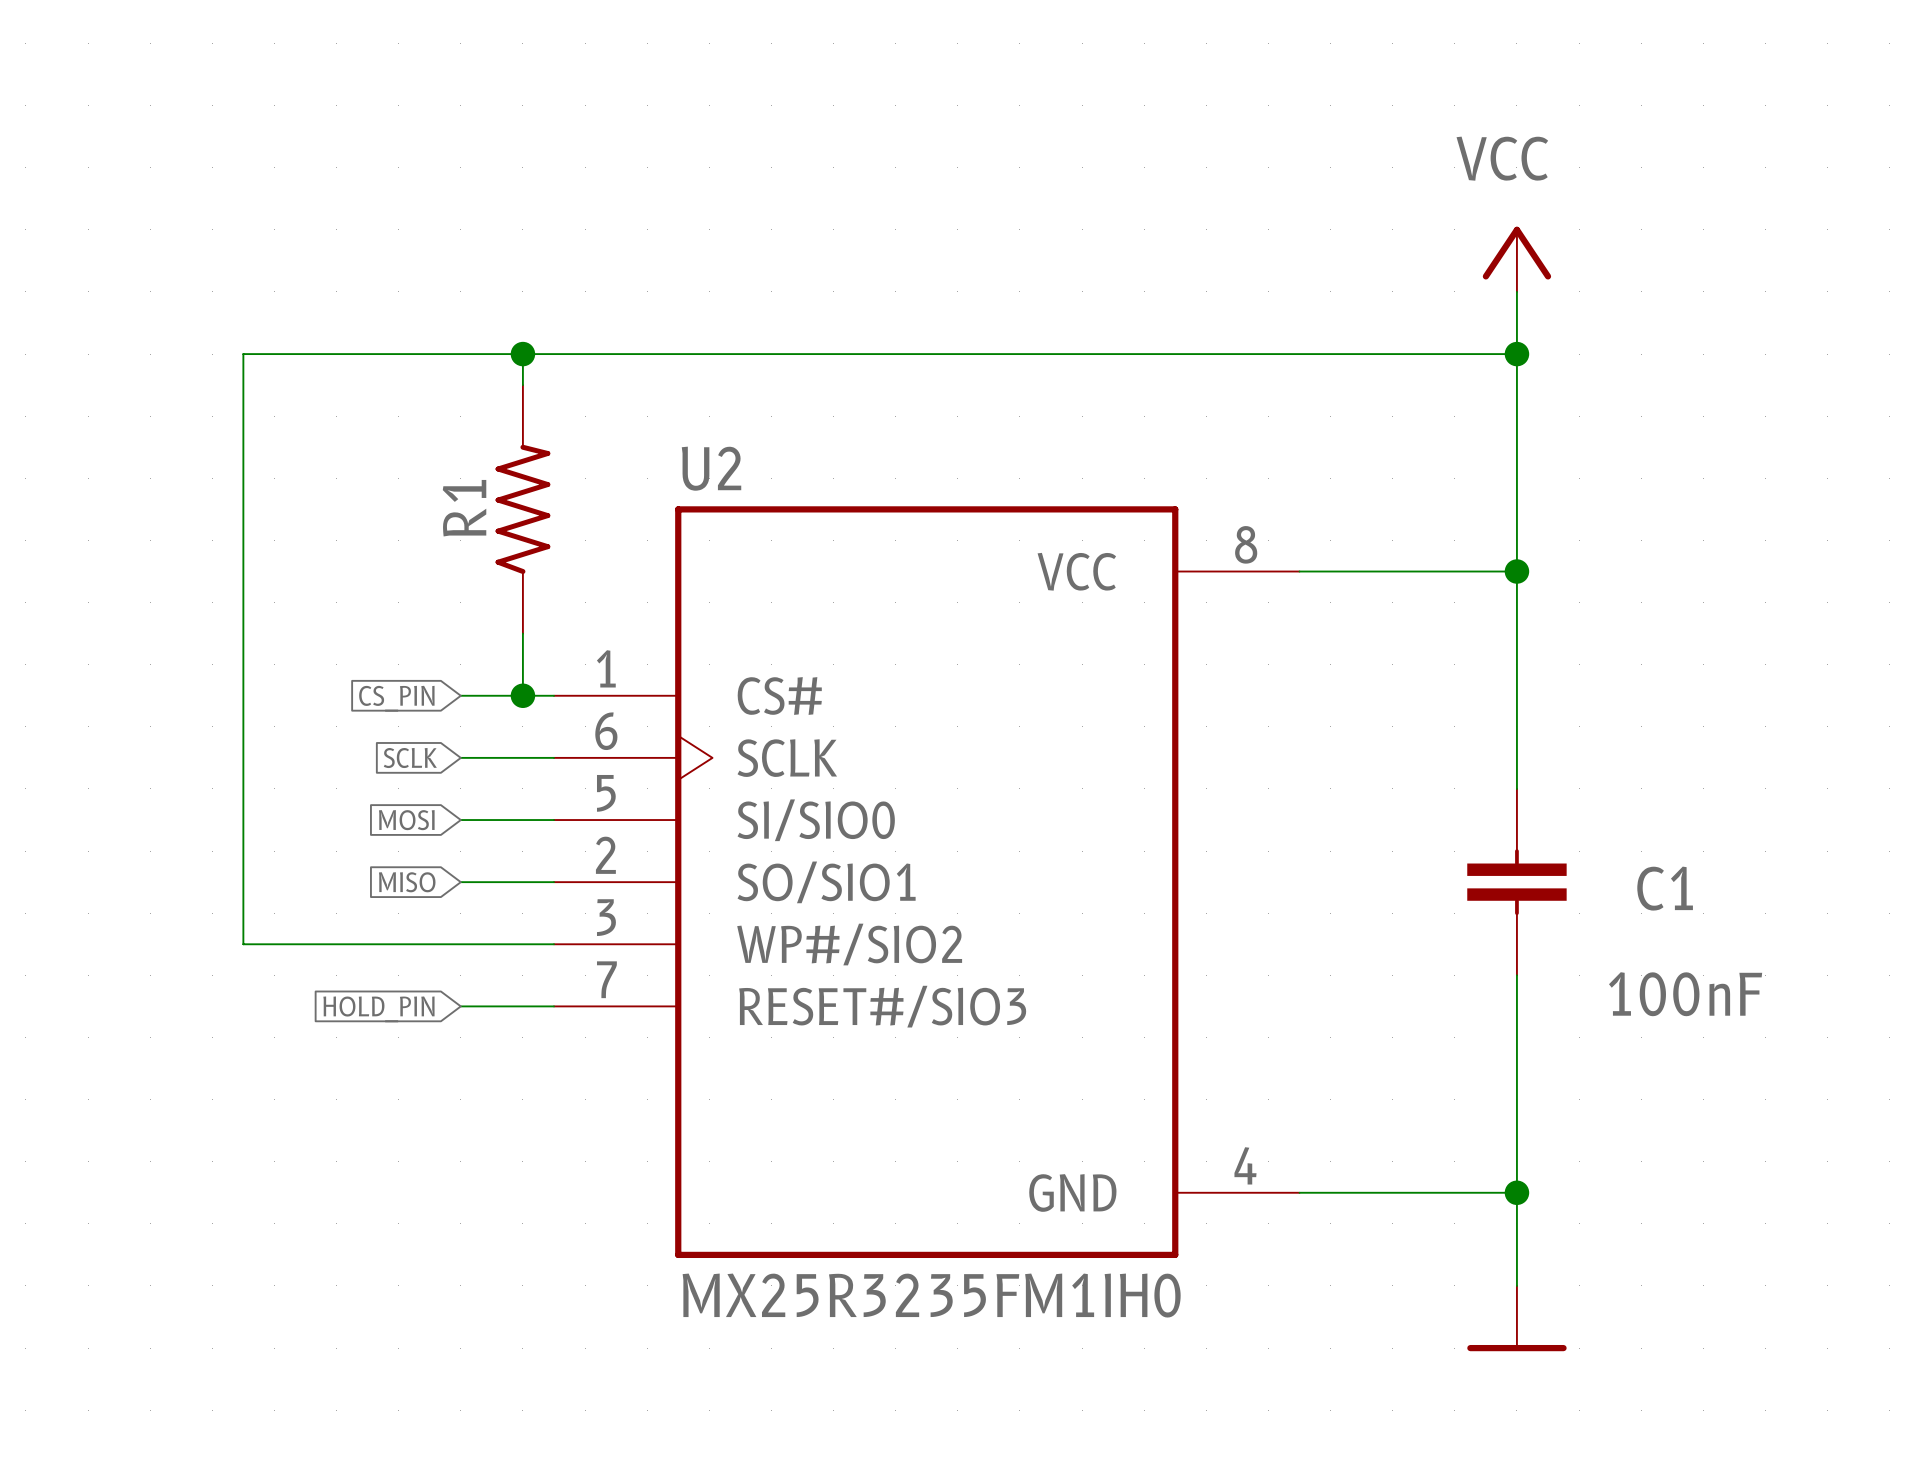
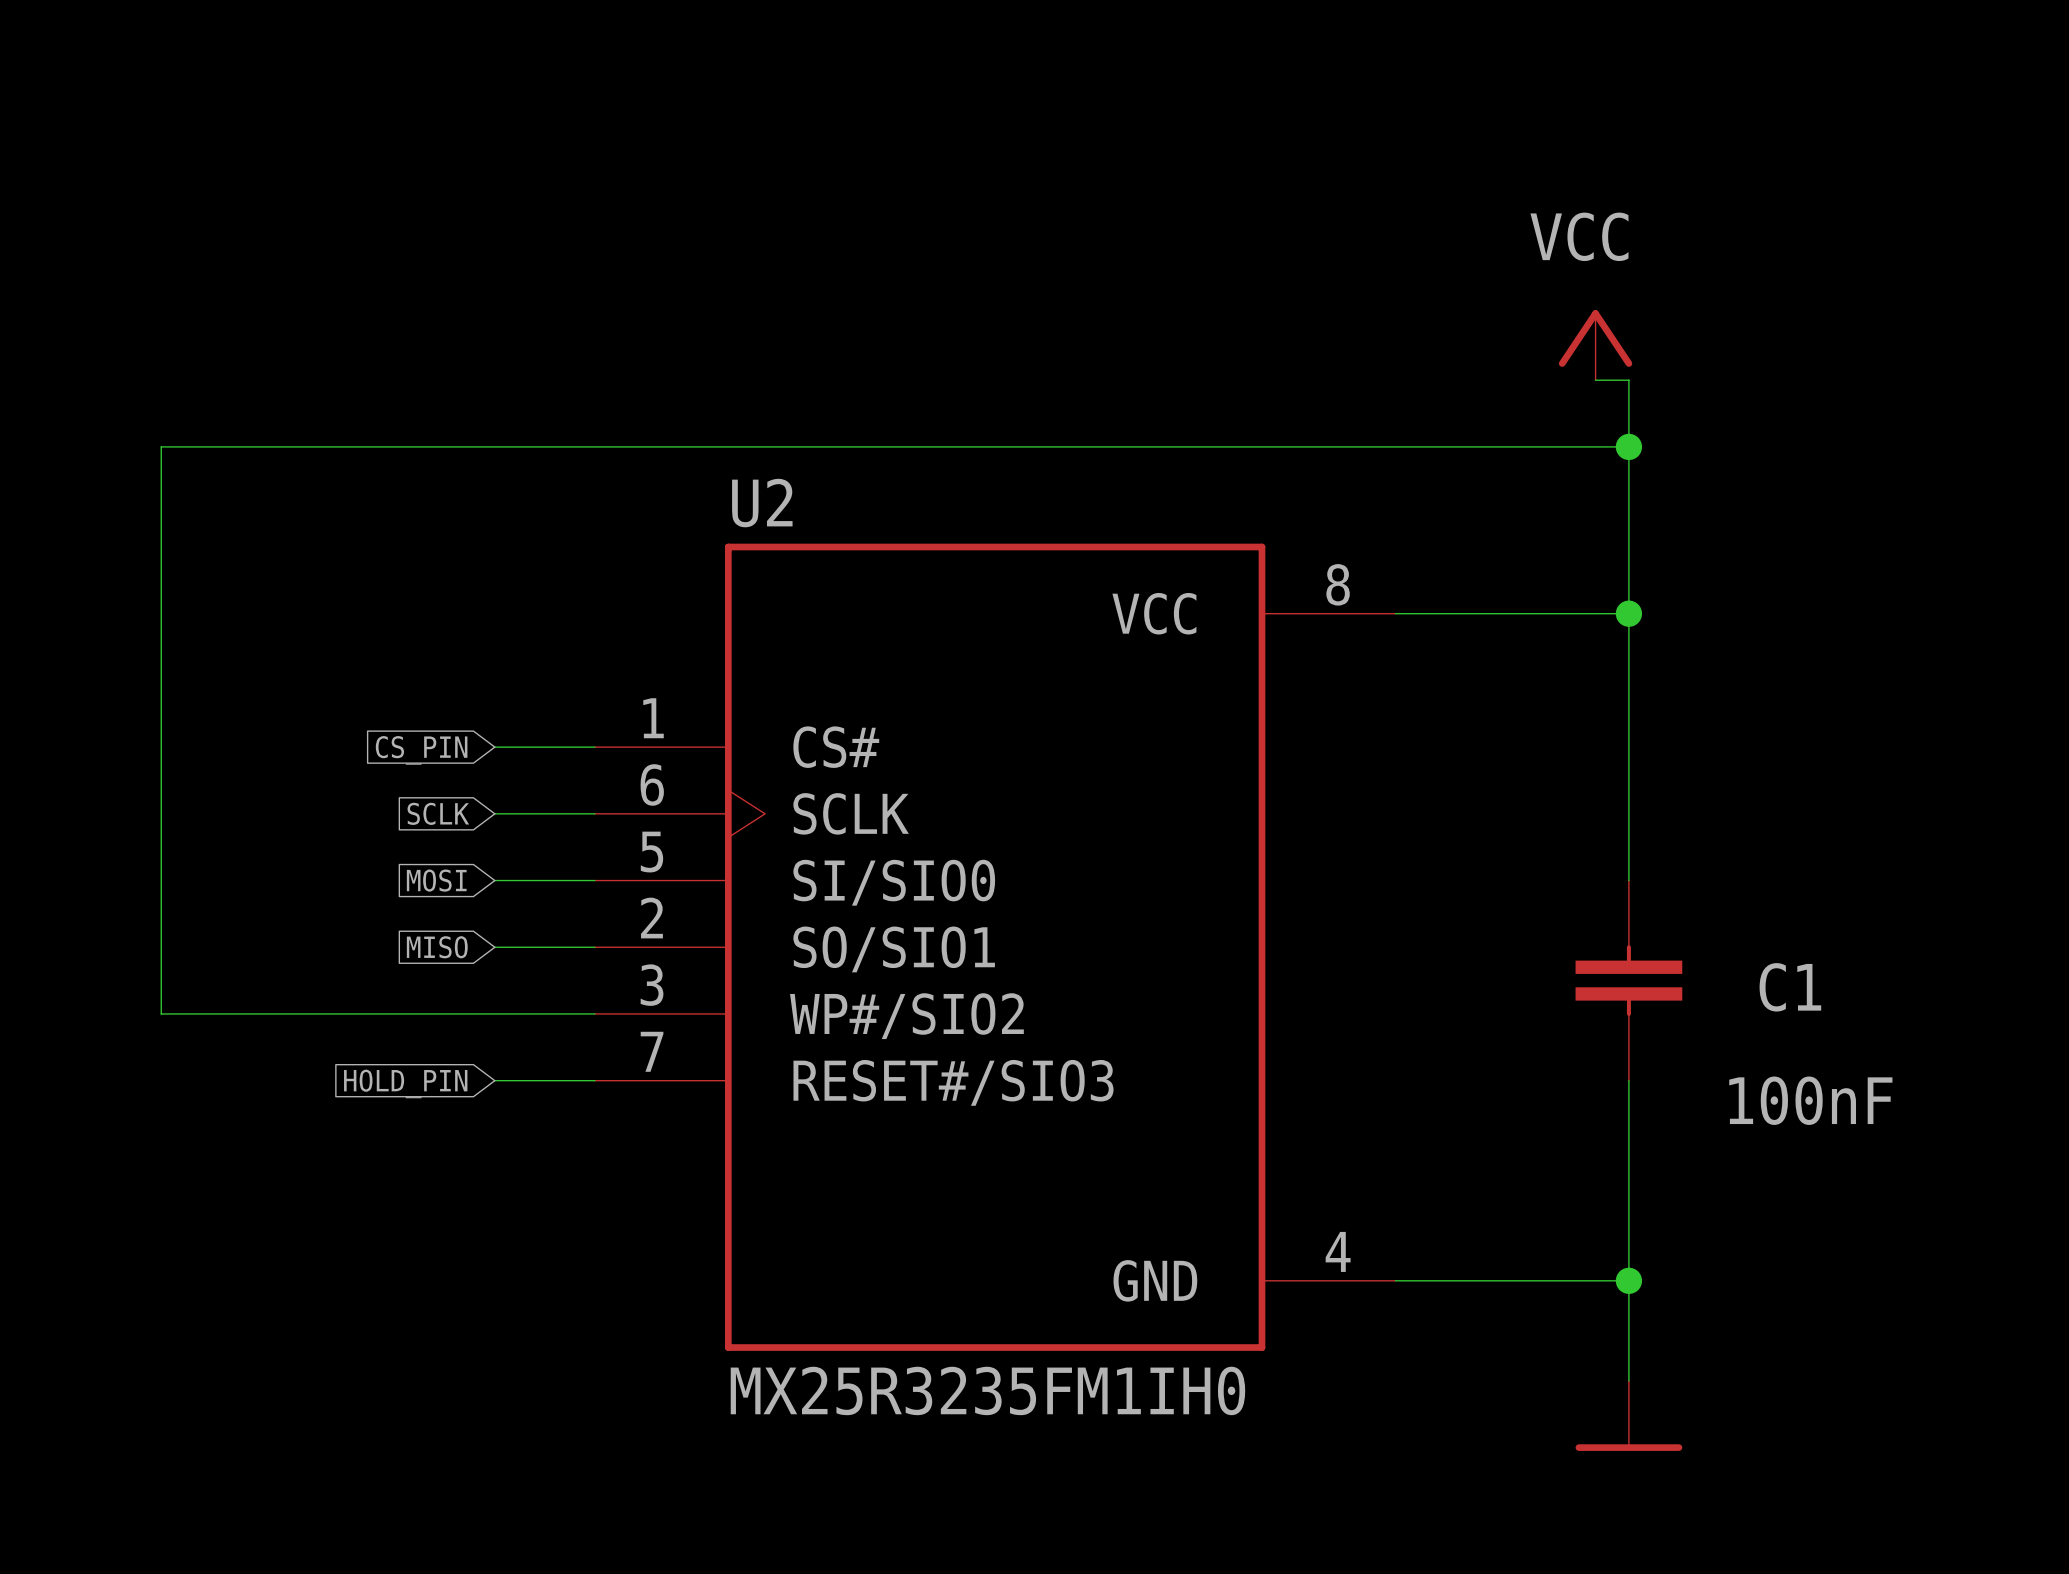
power symbol position: VCC (1516, 259) -> VCC (1595, 345)
wire: (1516, 291) (1516, 354) -> none
wire: (522, 354) (522, 385) -> none
junction: (522, 354) -> none
wire: (1485, 354) (243, 354) (243, 944) -> (1628, 446) (161, 446) (161, 1013) (261, 1013)
junction position: (1516, 354) -> (1628, 446)
R1: (522, 509) -> none
wire: (522, 633) (522, 695) -> none
junction: (522, 695) -> none
C1 position: (1516, 882) -> (1628, 980)

